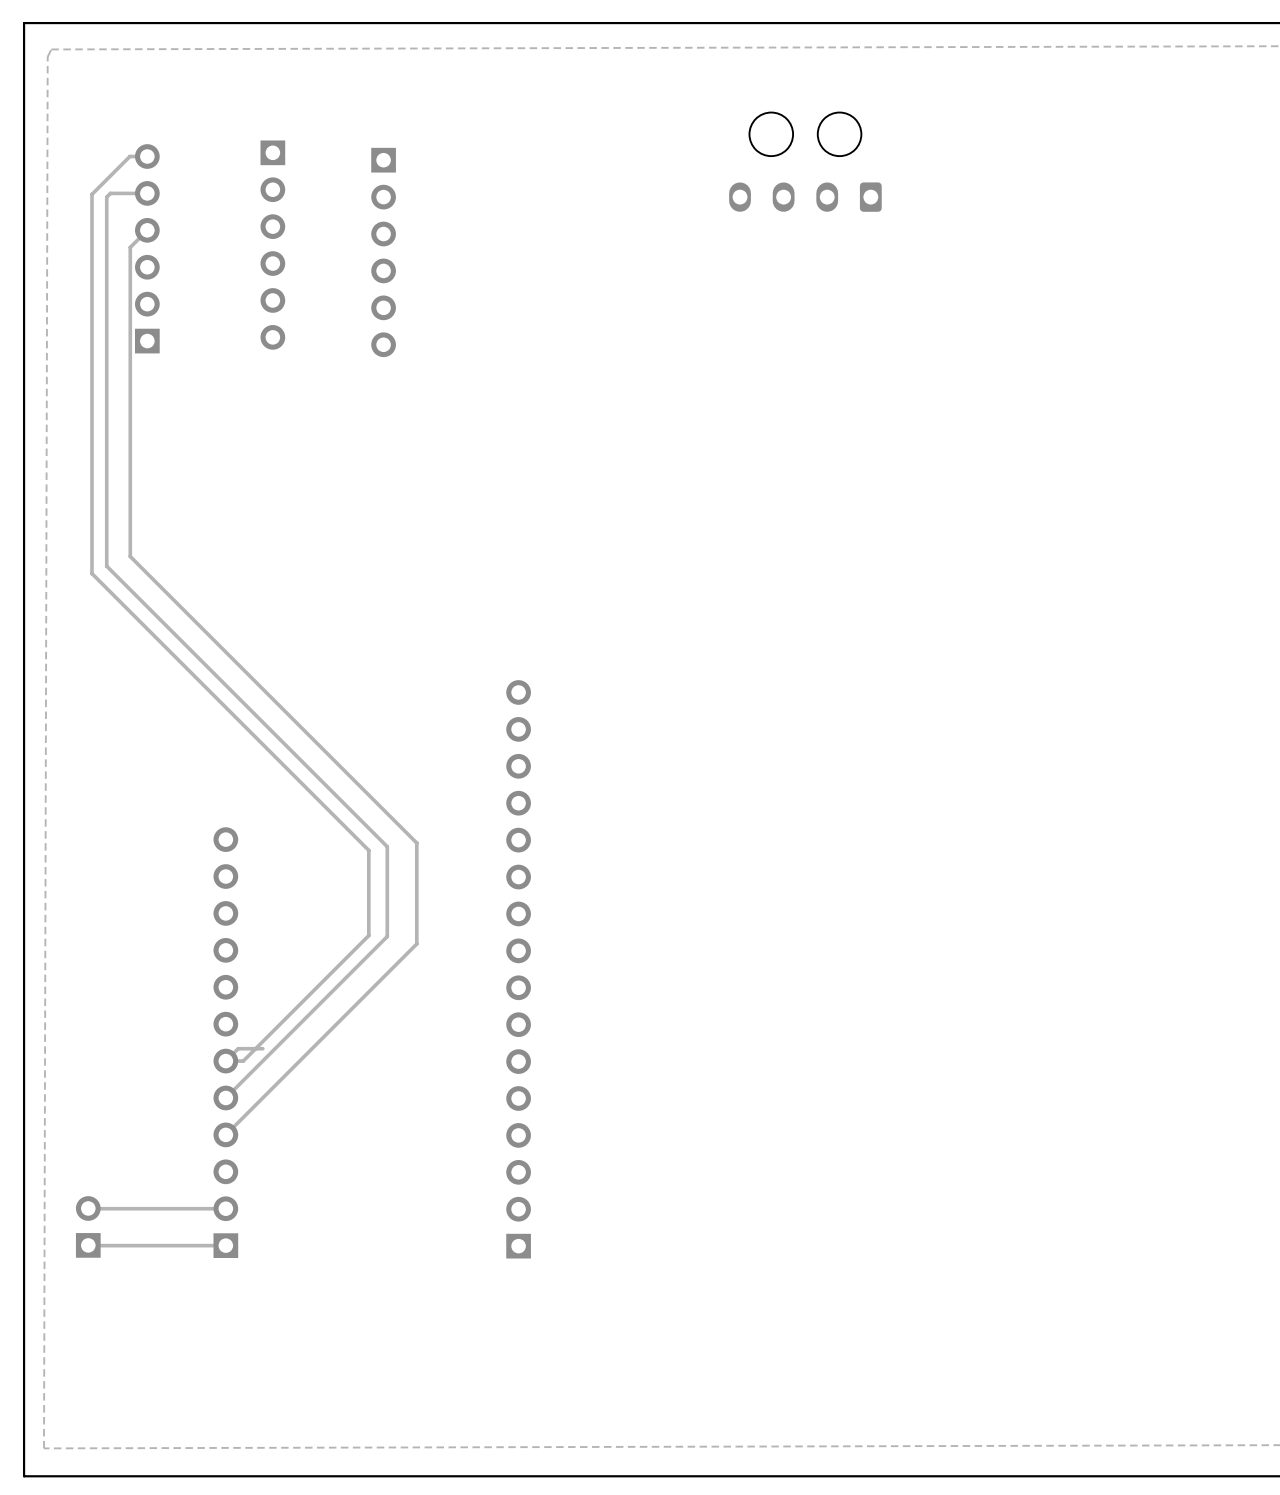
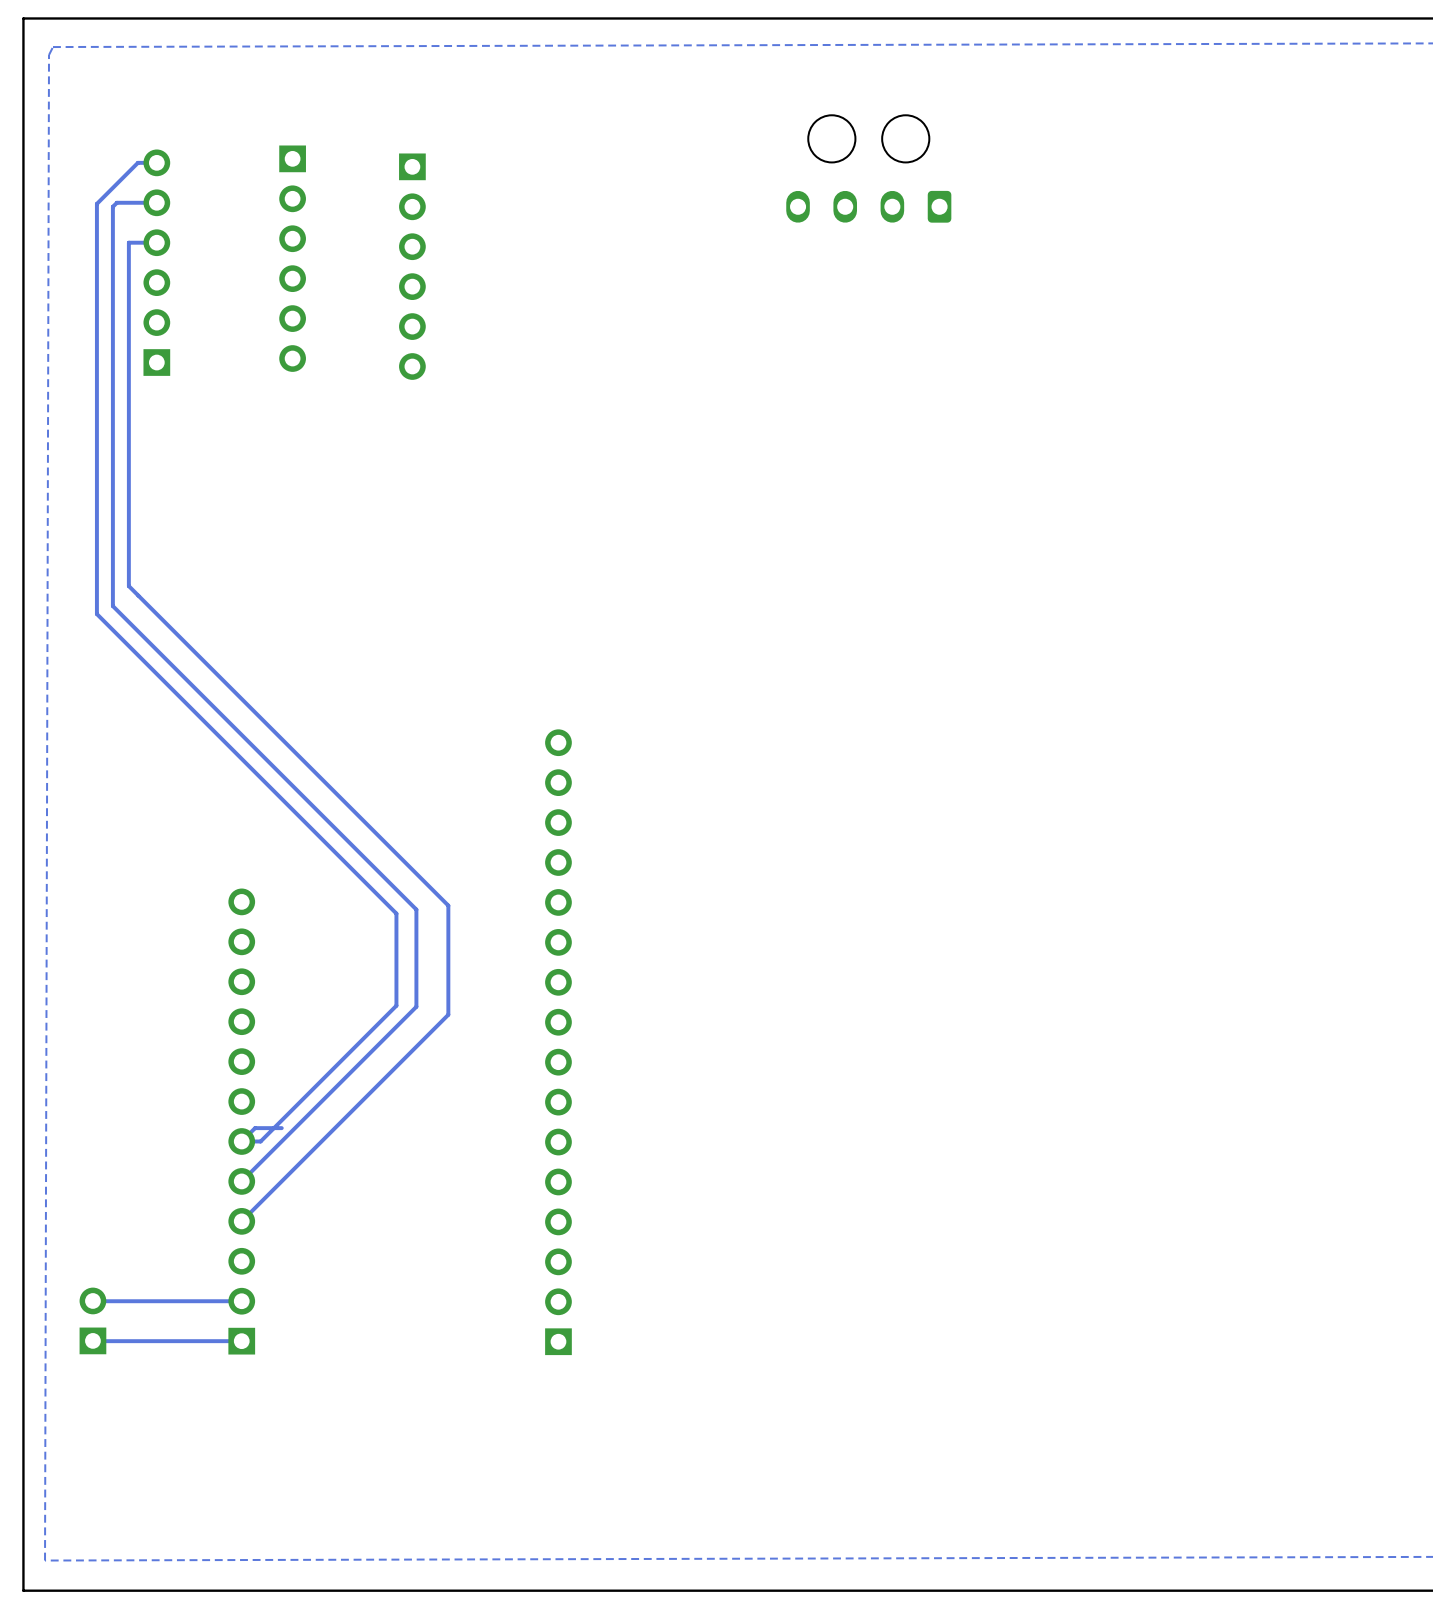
track: (147, 230) (130, 247) (130, 556) -> (156, 242) (128, 242) (128, 586) (138, 595)

